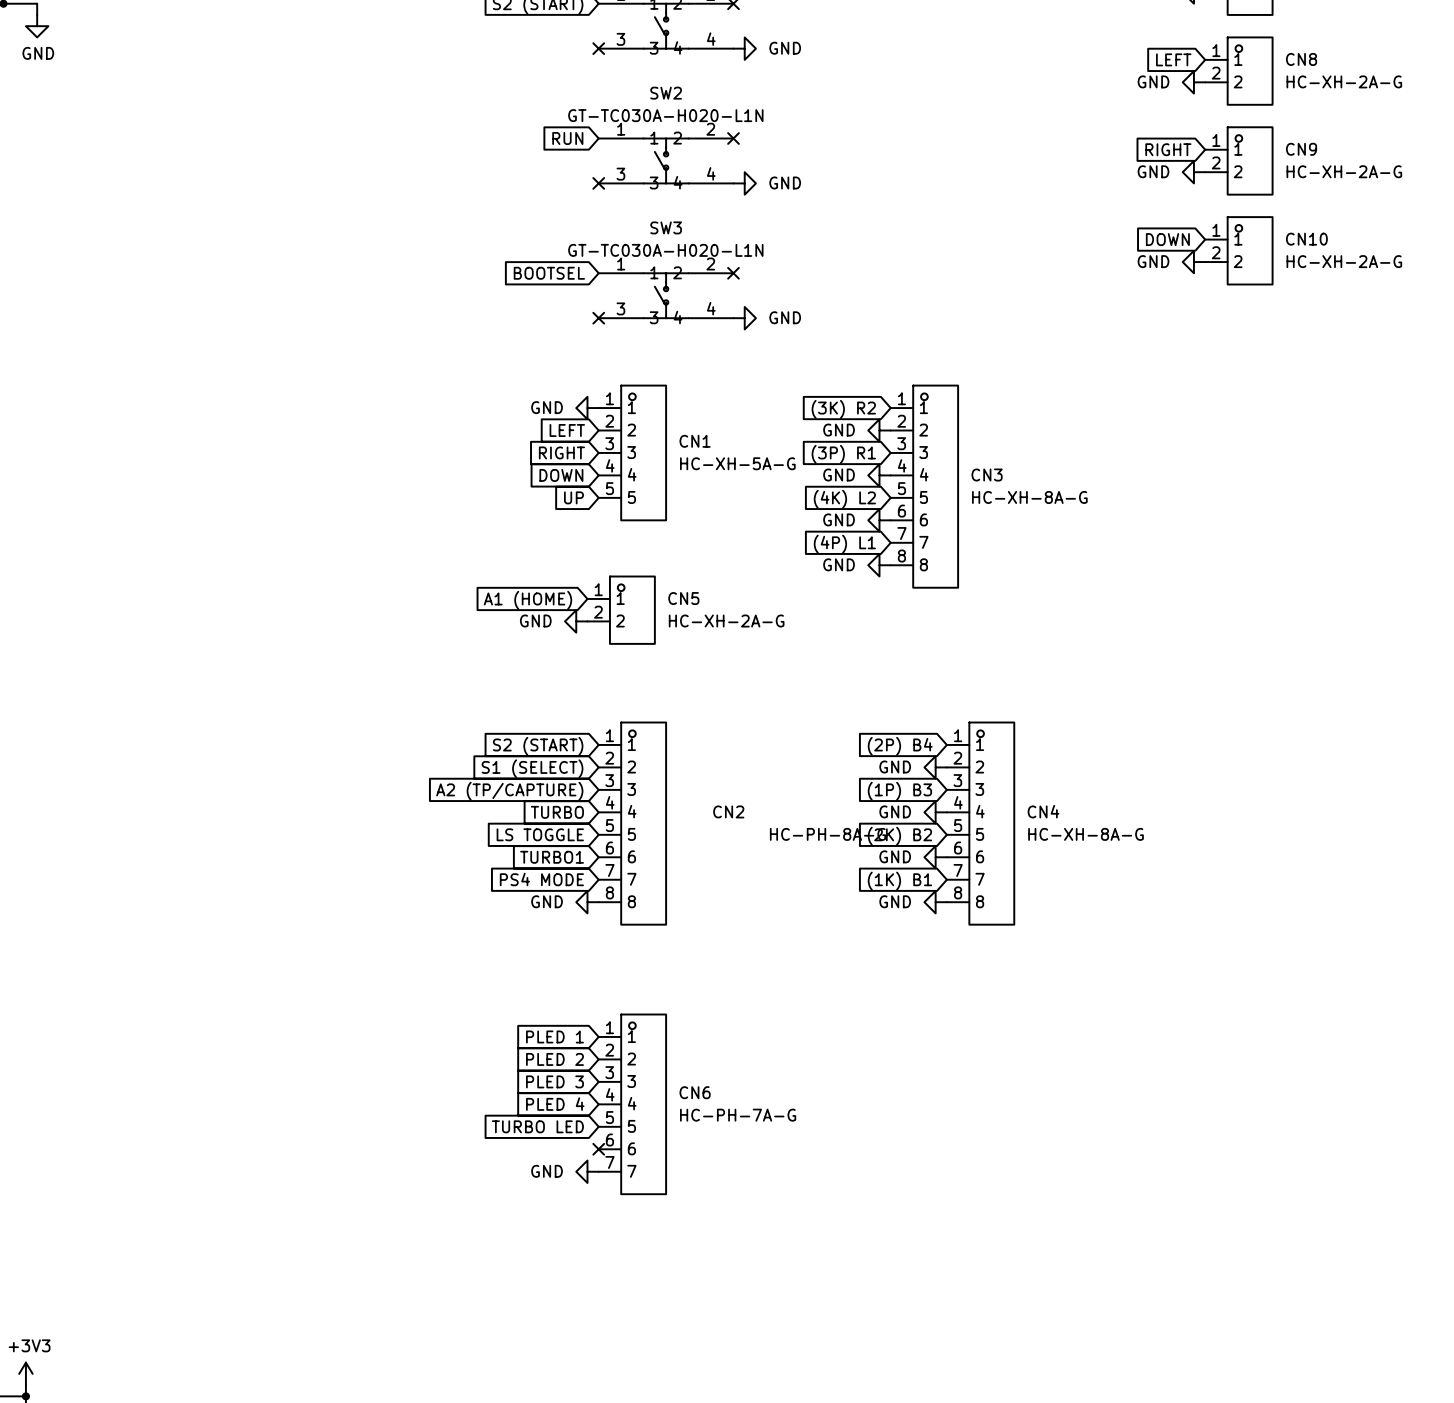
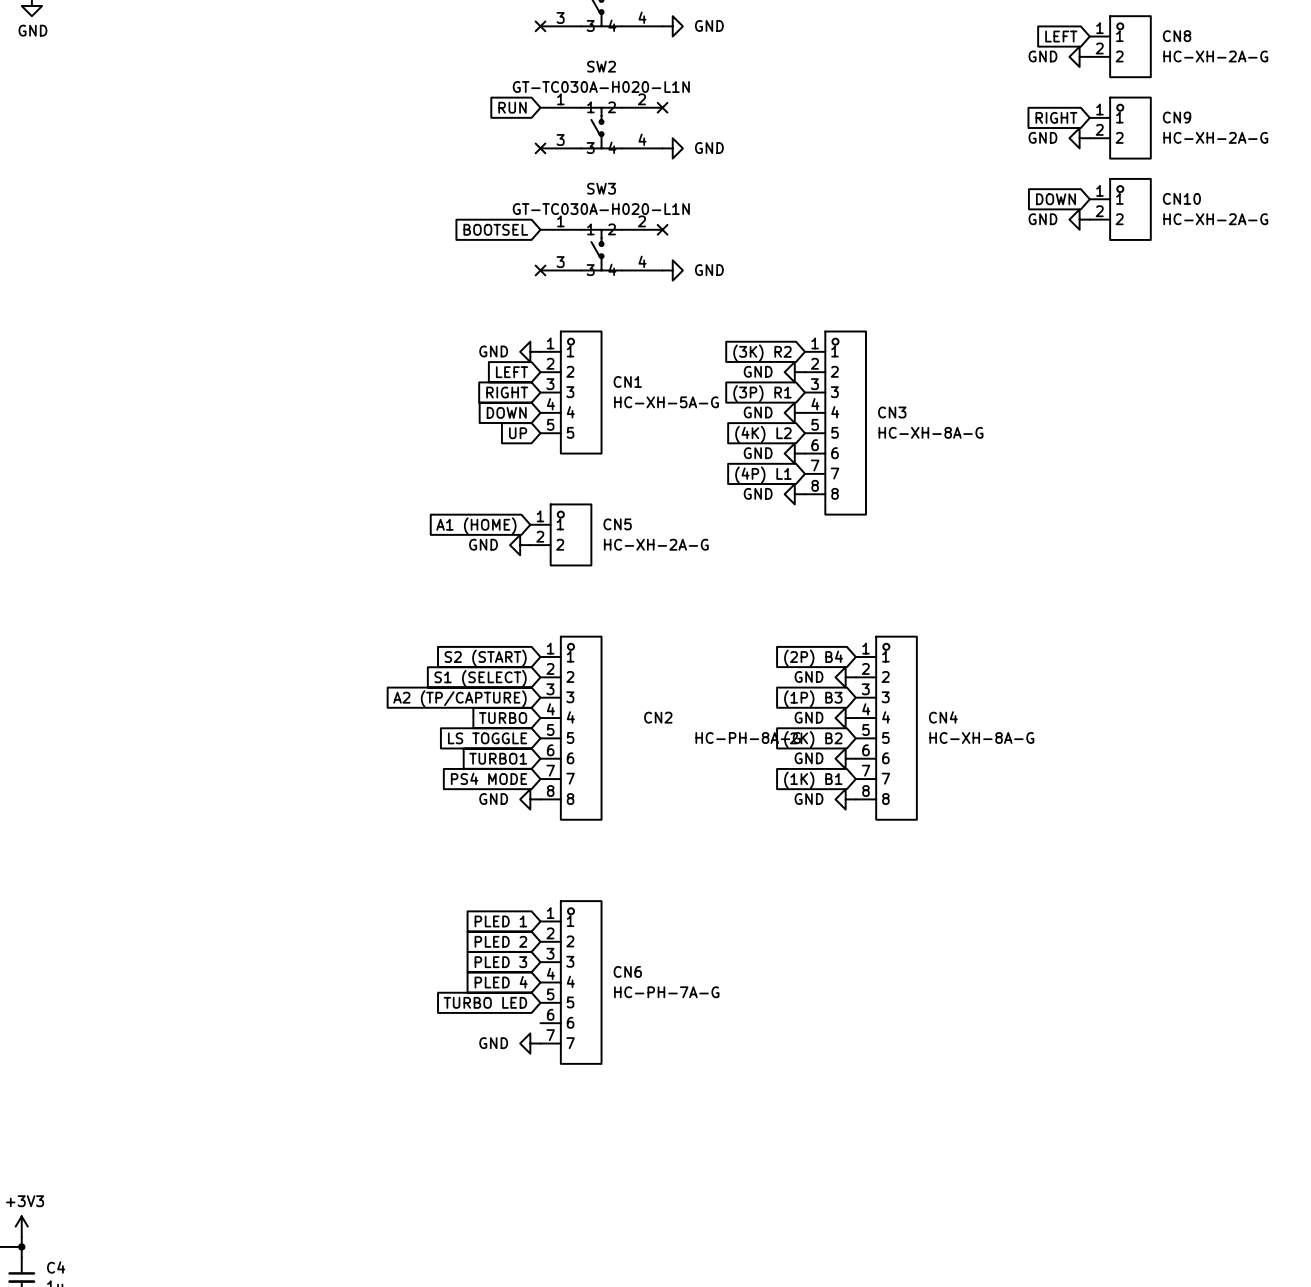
no-connect mark: (598, 1149) -> none

